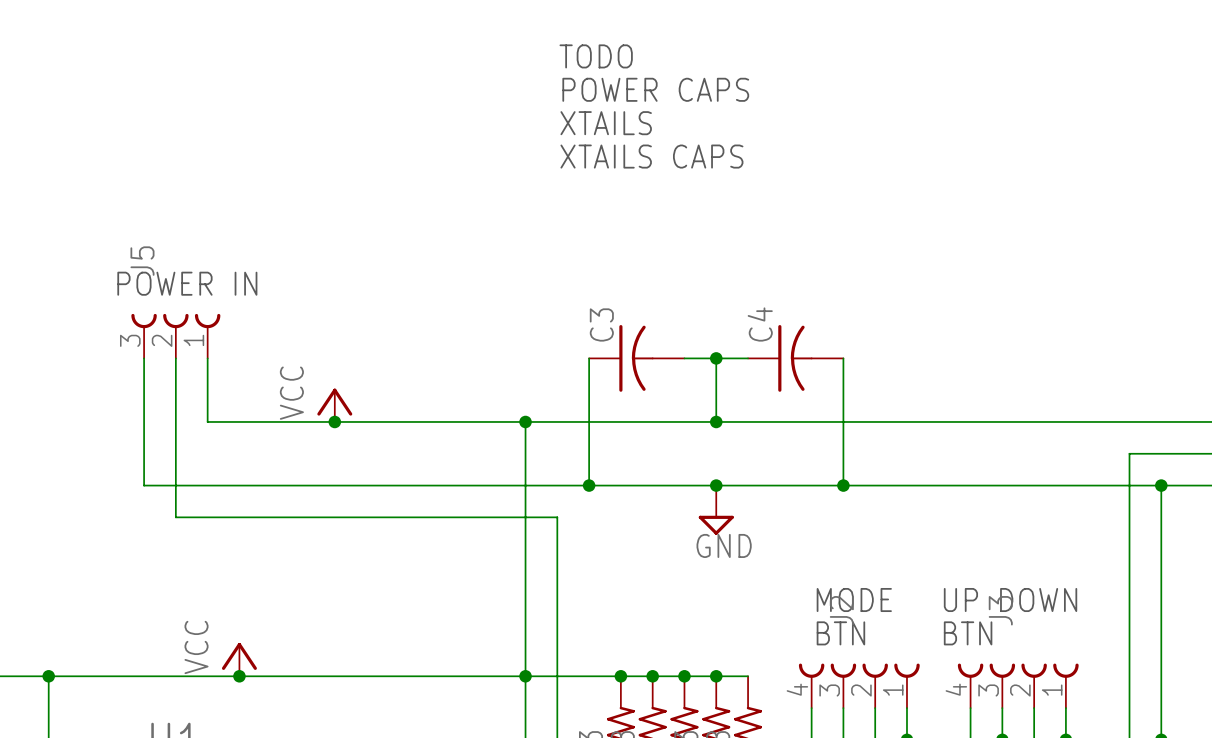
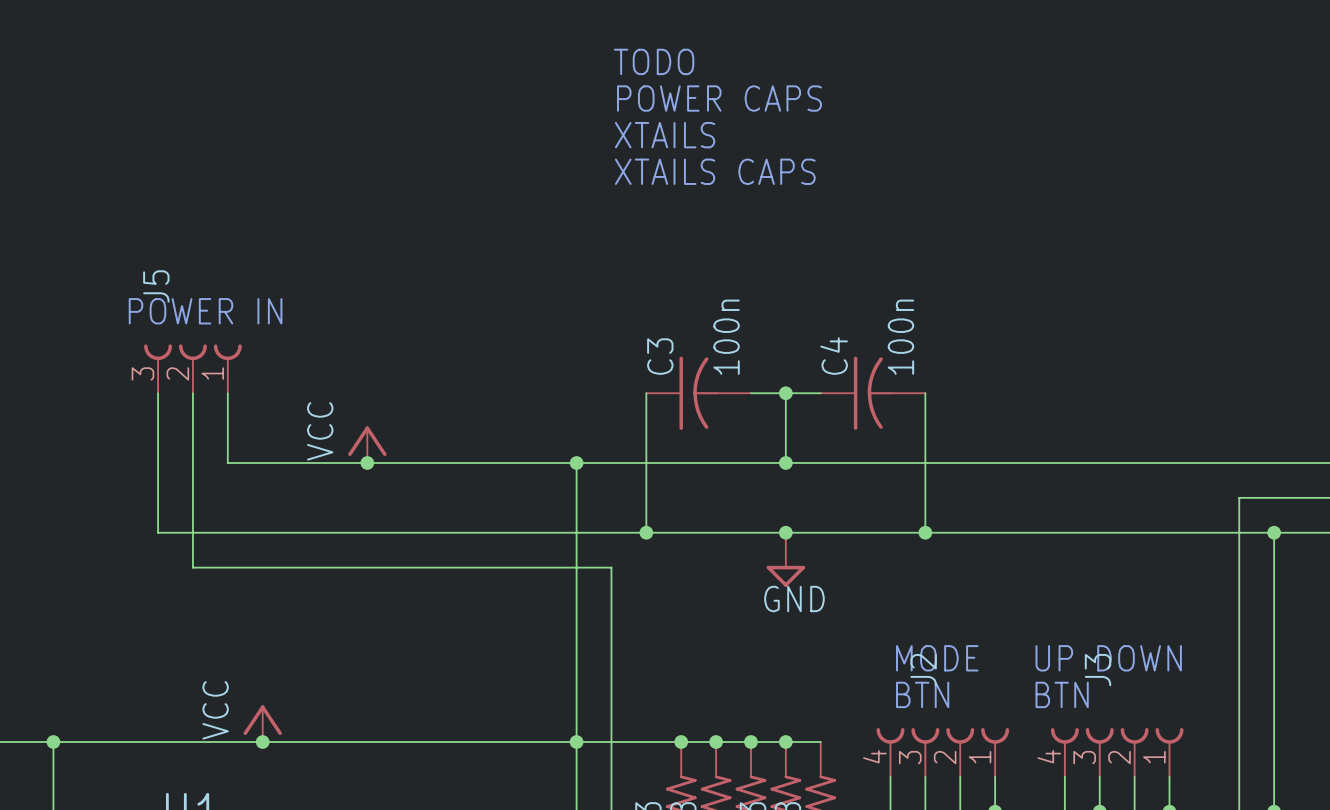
C3 value: none -> 100n (726, 337)
C4 value: none -> 100n (900, 337)

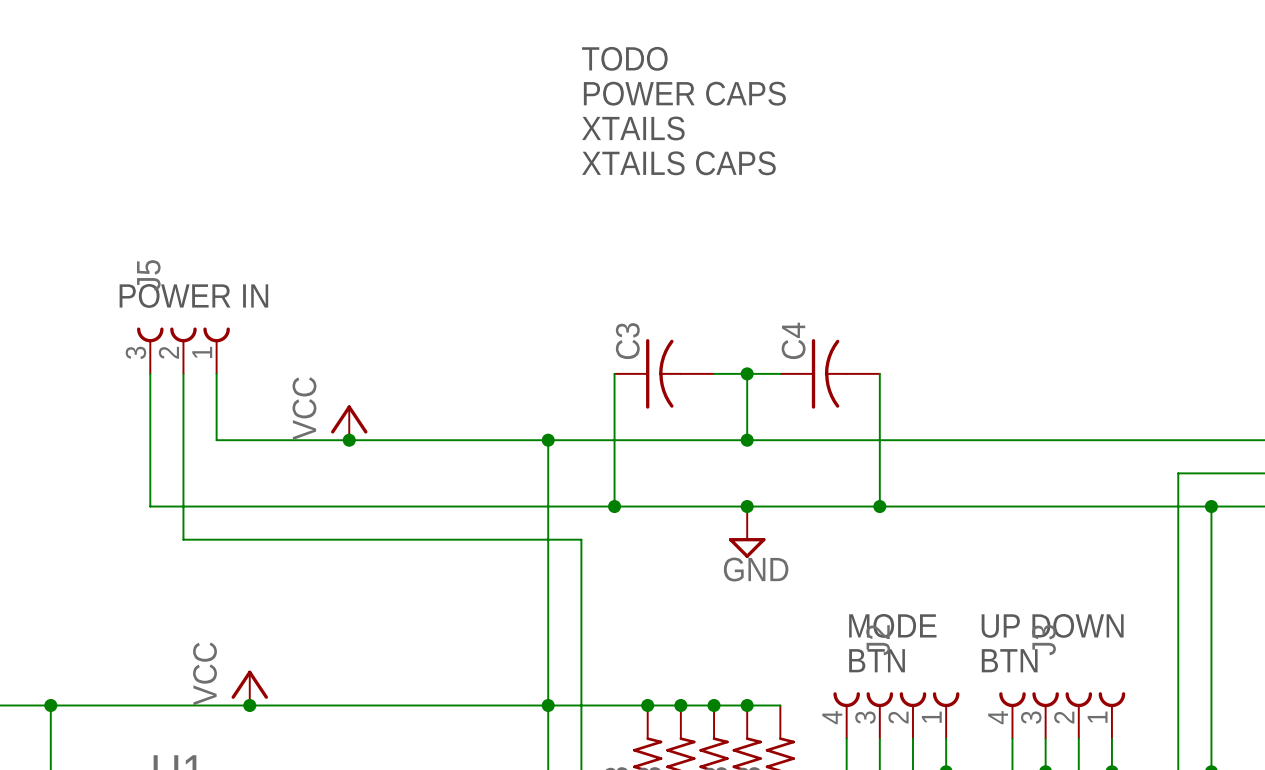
C3 value: 100n (726, 337) -> none
C4 value: 100n (900, 337) -> none

